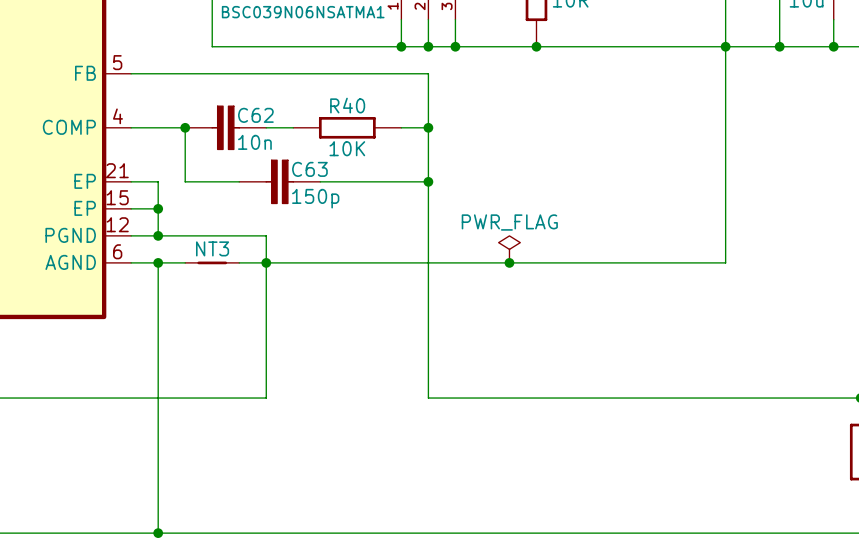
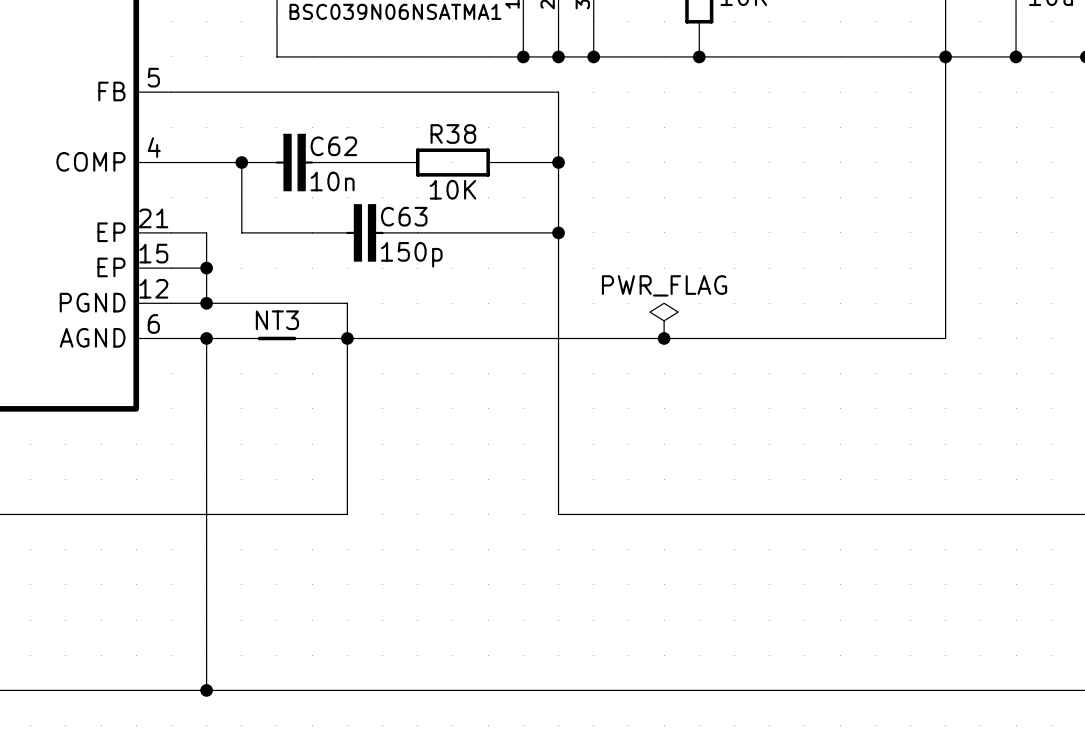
R40 name: R40 (347, 105) -> R38 (453, 133)

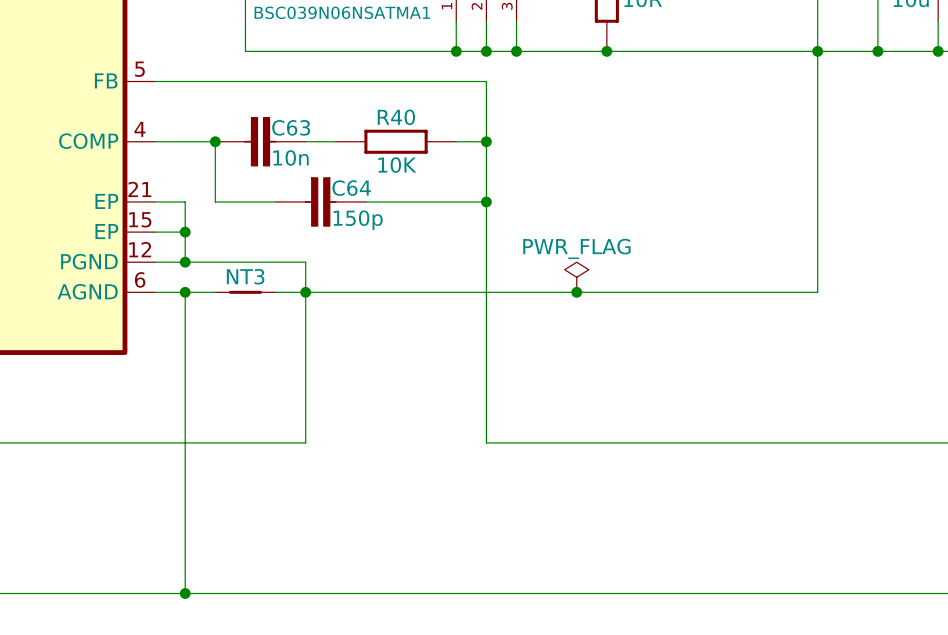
R38 name: R38 (453, 133) -> R40 (396, 117)
C62 name: C62 (333, 146) -> C63 (291, 127)
C63 name: C63 (404, 216) -> C64 (351, 188)

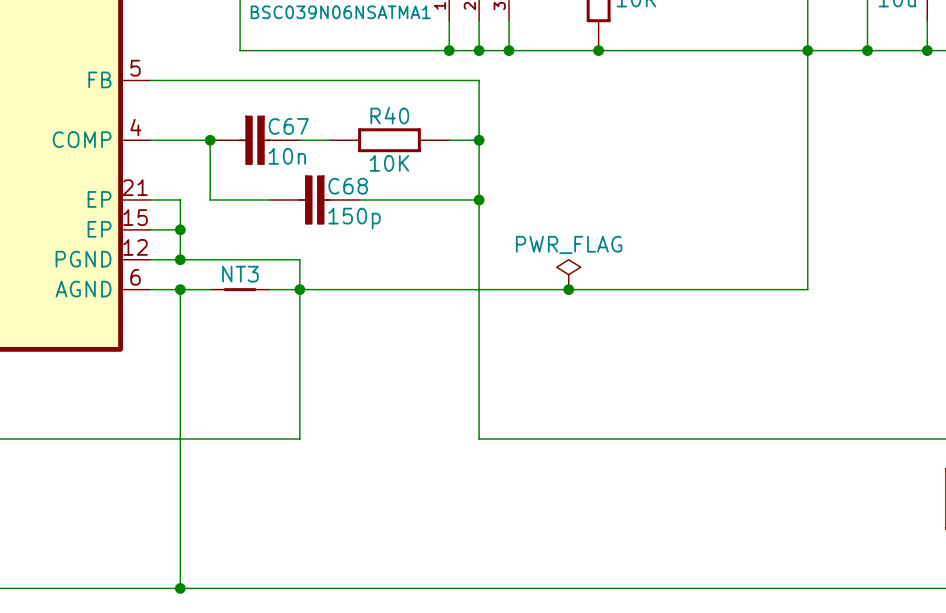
C63 name: C63 (291, 127) -> C67 (288, 126)
C64 name: C64 (351, 188) -> C68 (348, 186)

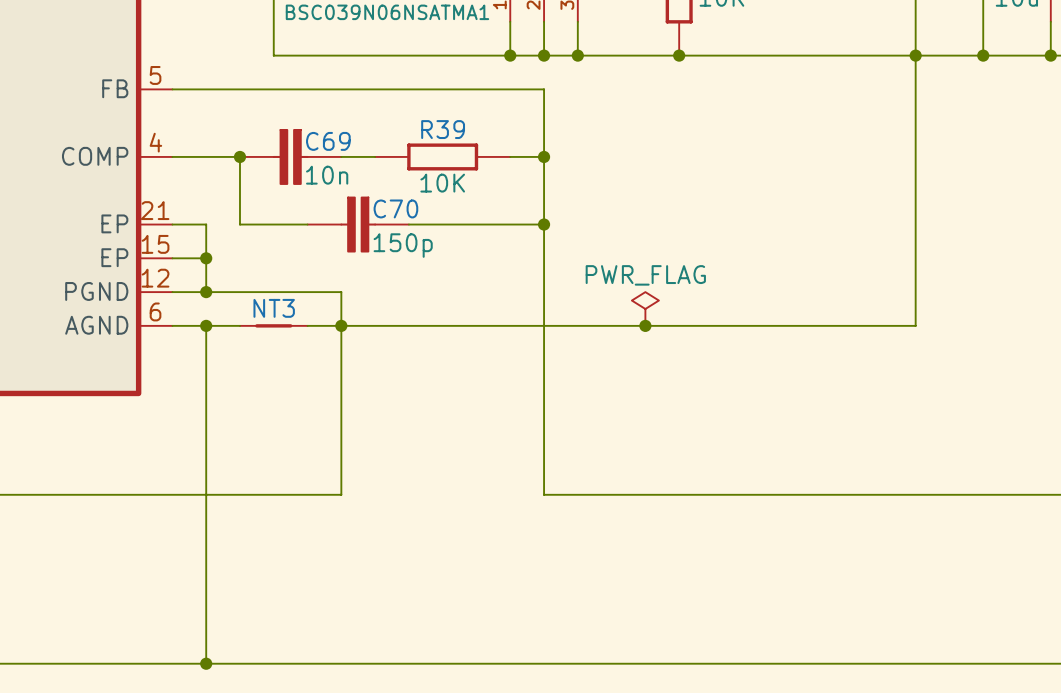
R40 name: R40 (389, 115) -> R39 (443, 129)
C67 name: C67 (288, 126) -> C69 (328, 141)
C68 name: C68 (348, 186) -> C70 (395, 208)

